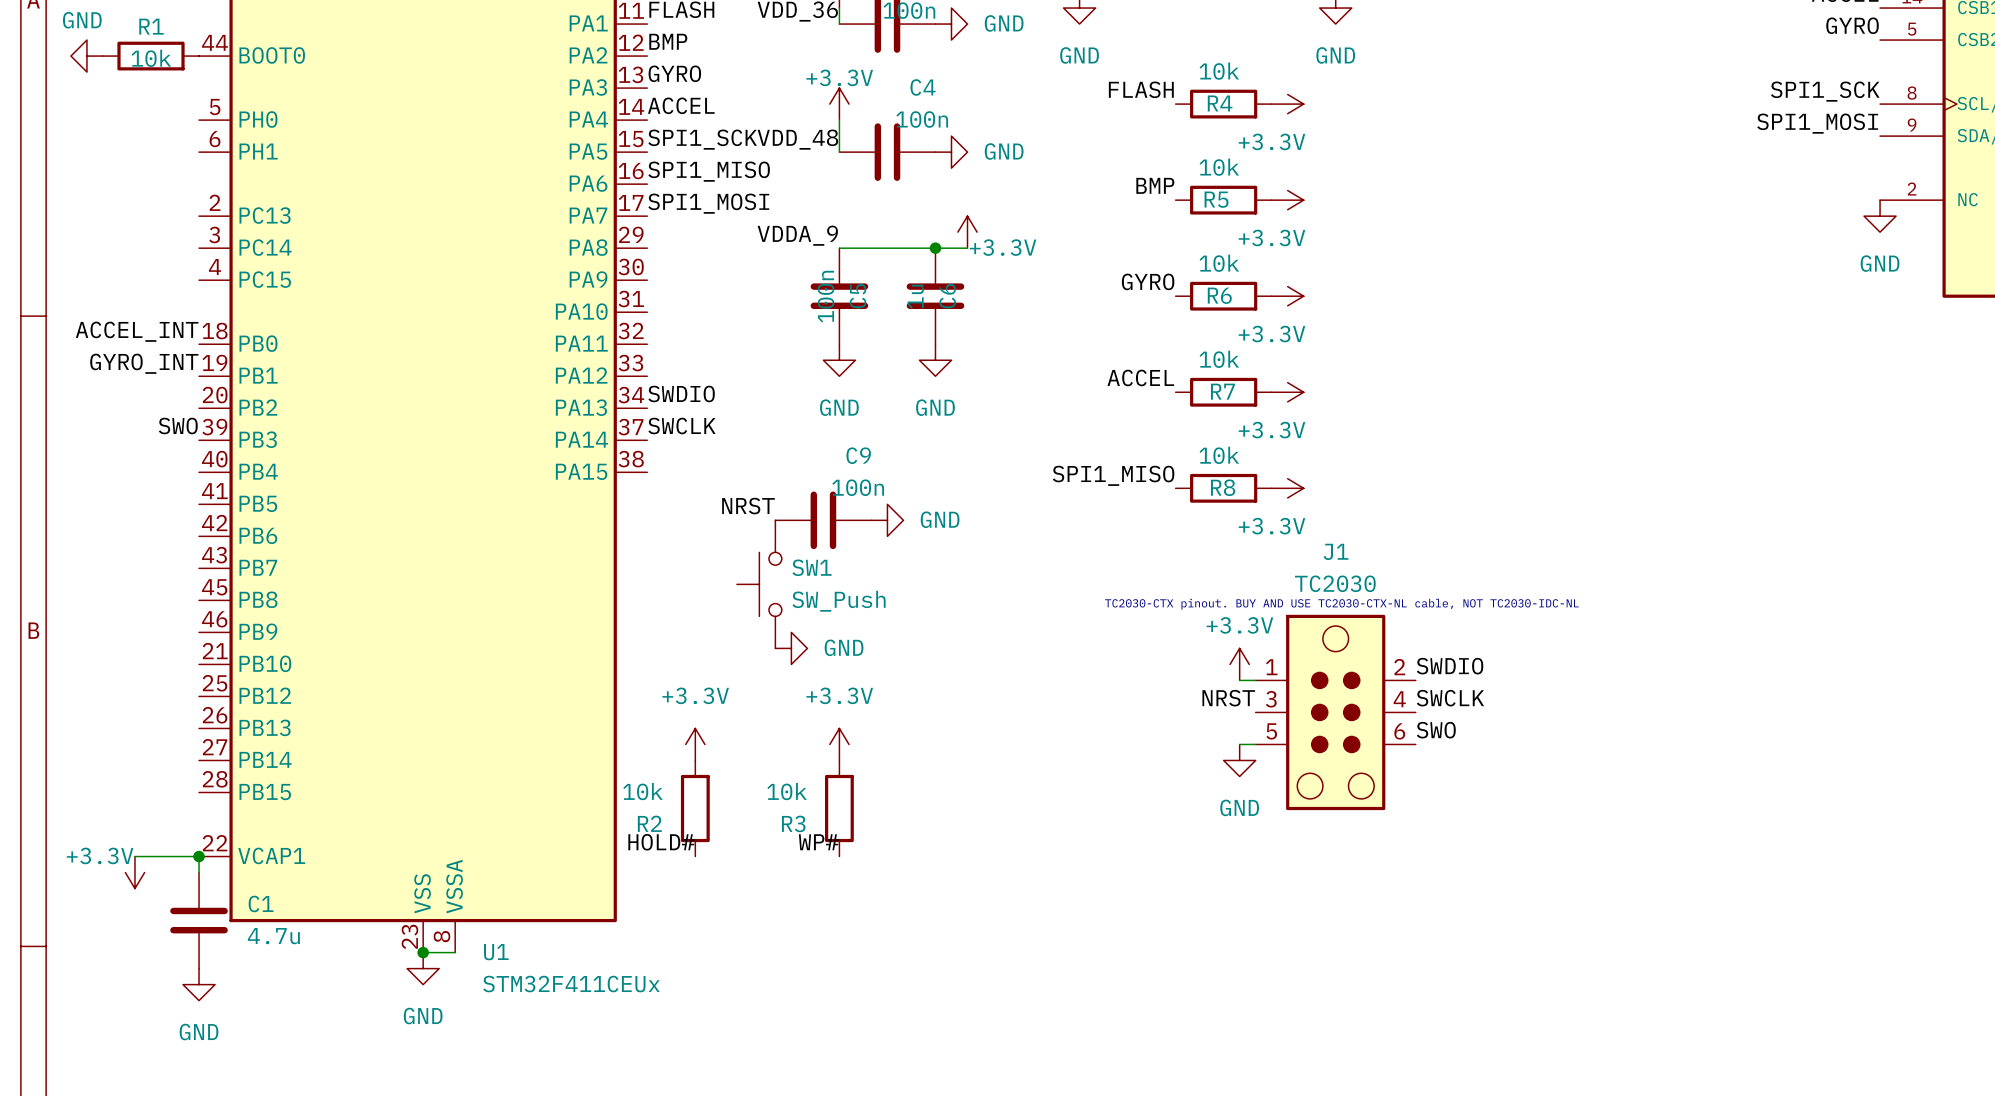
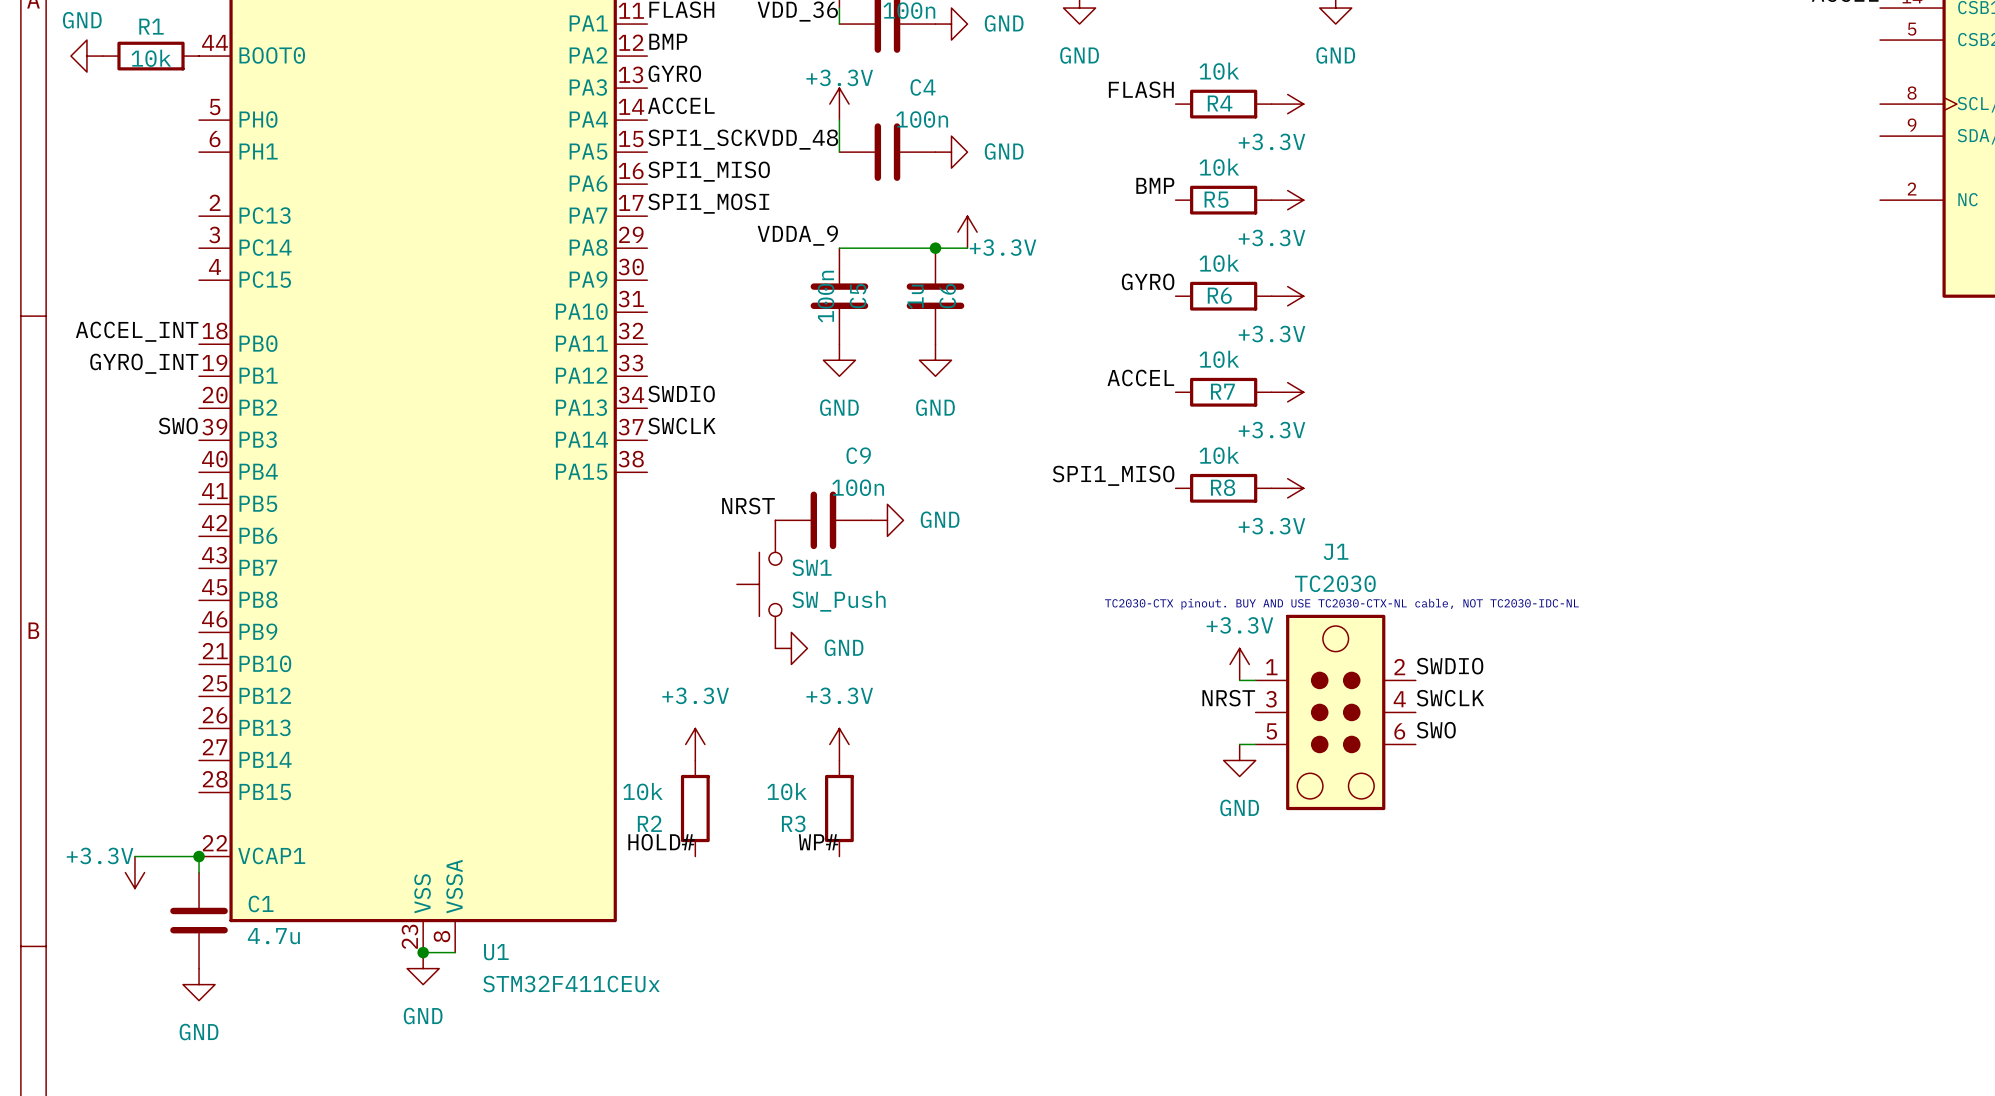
label: GYRO (1852, 25) -> none
label: SPI1_SCK (1825, 91) -> none
label: SPI1_MOSI (1817, 123) -> none
power symbol: GND (1880, 216) -> none

